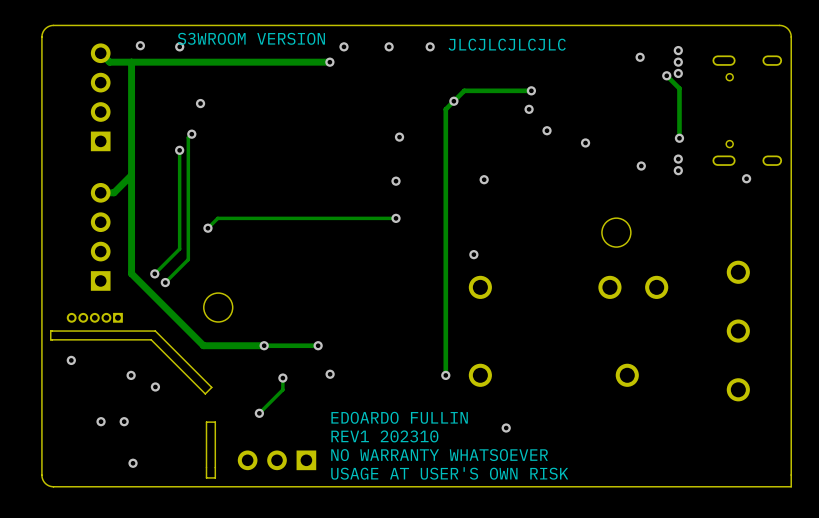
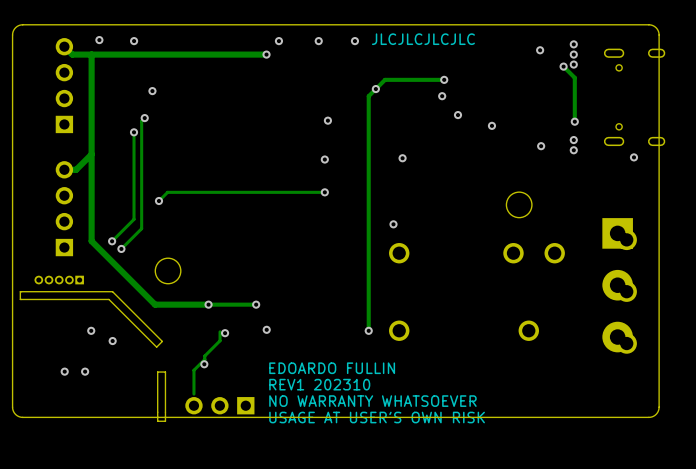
text: S3WROOM VERSION (251, 38) -> none
board edge: (41, 39) (44, 29) (53, 25) (779, 25) (785, 27) (791, 37) (791, 486) (53, 486) (47, 484) (43, 480) (41, 461) -> (12, 34) (15, 27) (22, 24) (648, 24) (656, 27) (659, 34) (659, 407) (654, 415) (648, 417) (22, 417) (15, 414) (12, 407)
part: none -> (617, 285)
via: (71, 360) -> none
track: none -> (220, 331) (220, 340) (204, 356) (204, 361)
track: (282, 378) (282, 389) (259, 413) -> none
track: none -> (204, 359) (193, 370) (193, 394)
via: (506, 428) -> none
via: (133, 463) -> none

